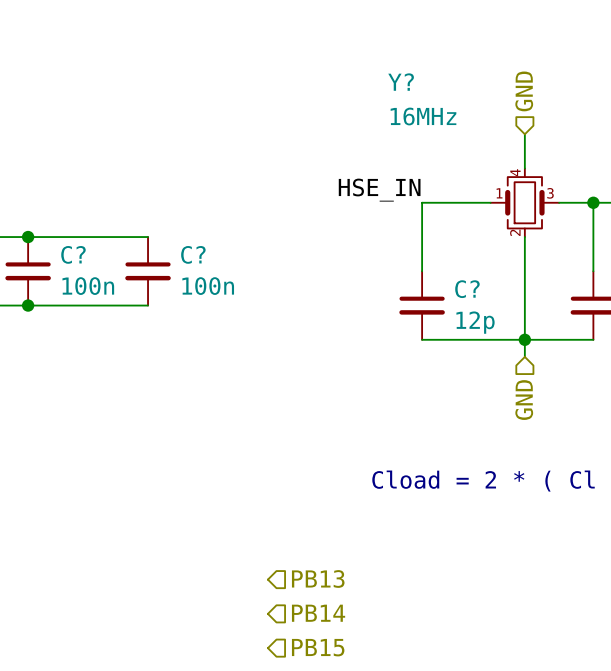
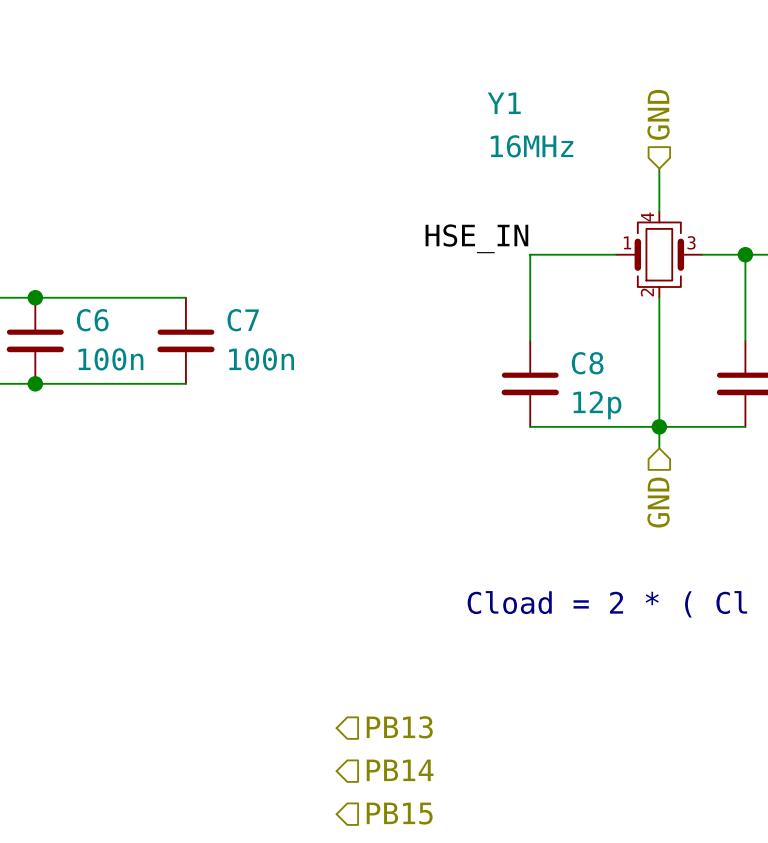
Y? name: Y? (401, 82) -> Y1 (504, 103)
C? name: C? (73, 254) -> C6 (92, 320)
C? name: C? (193, 254) -> C7 (243, 320)
C? name: C? (467, 289) -> C8 (587, 363)

